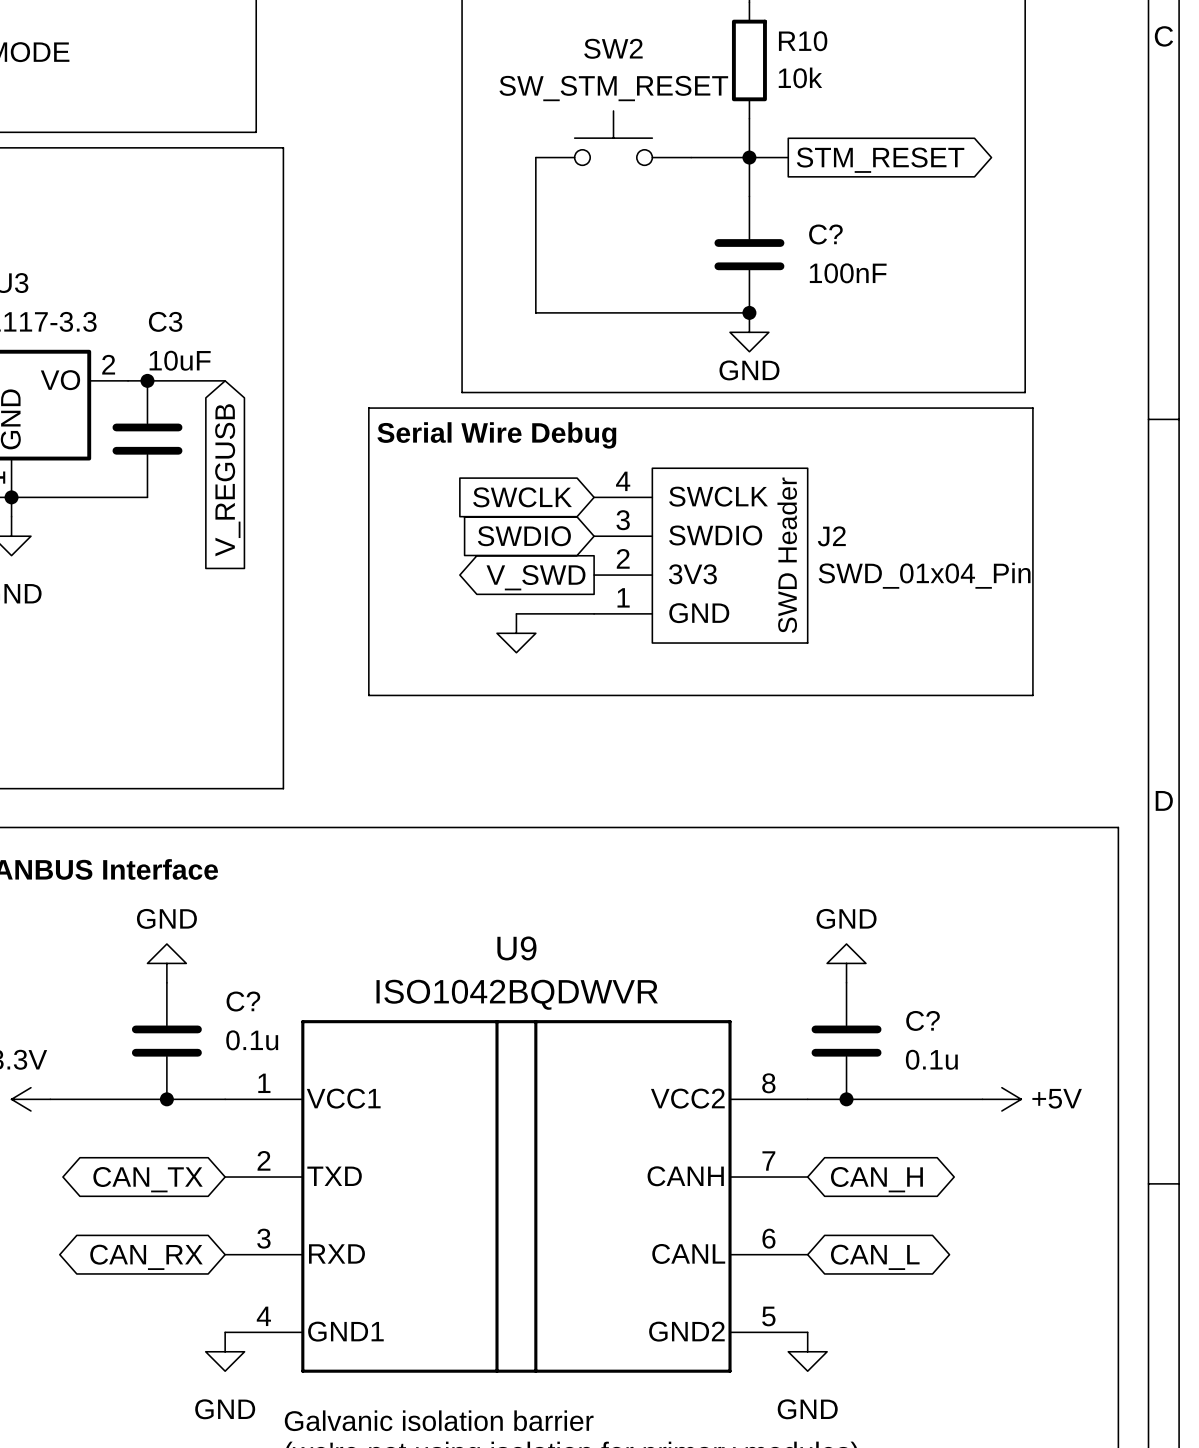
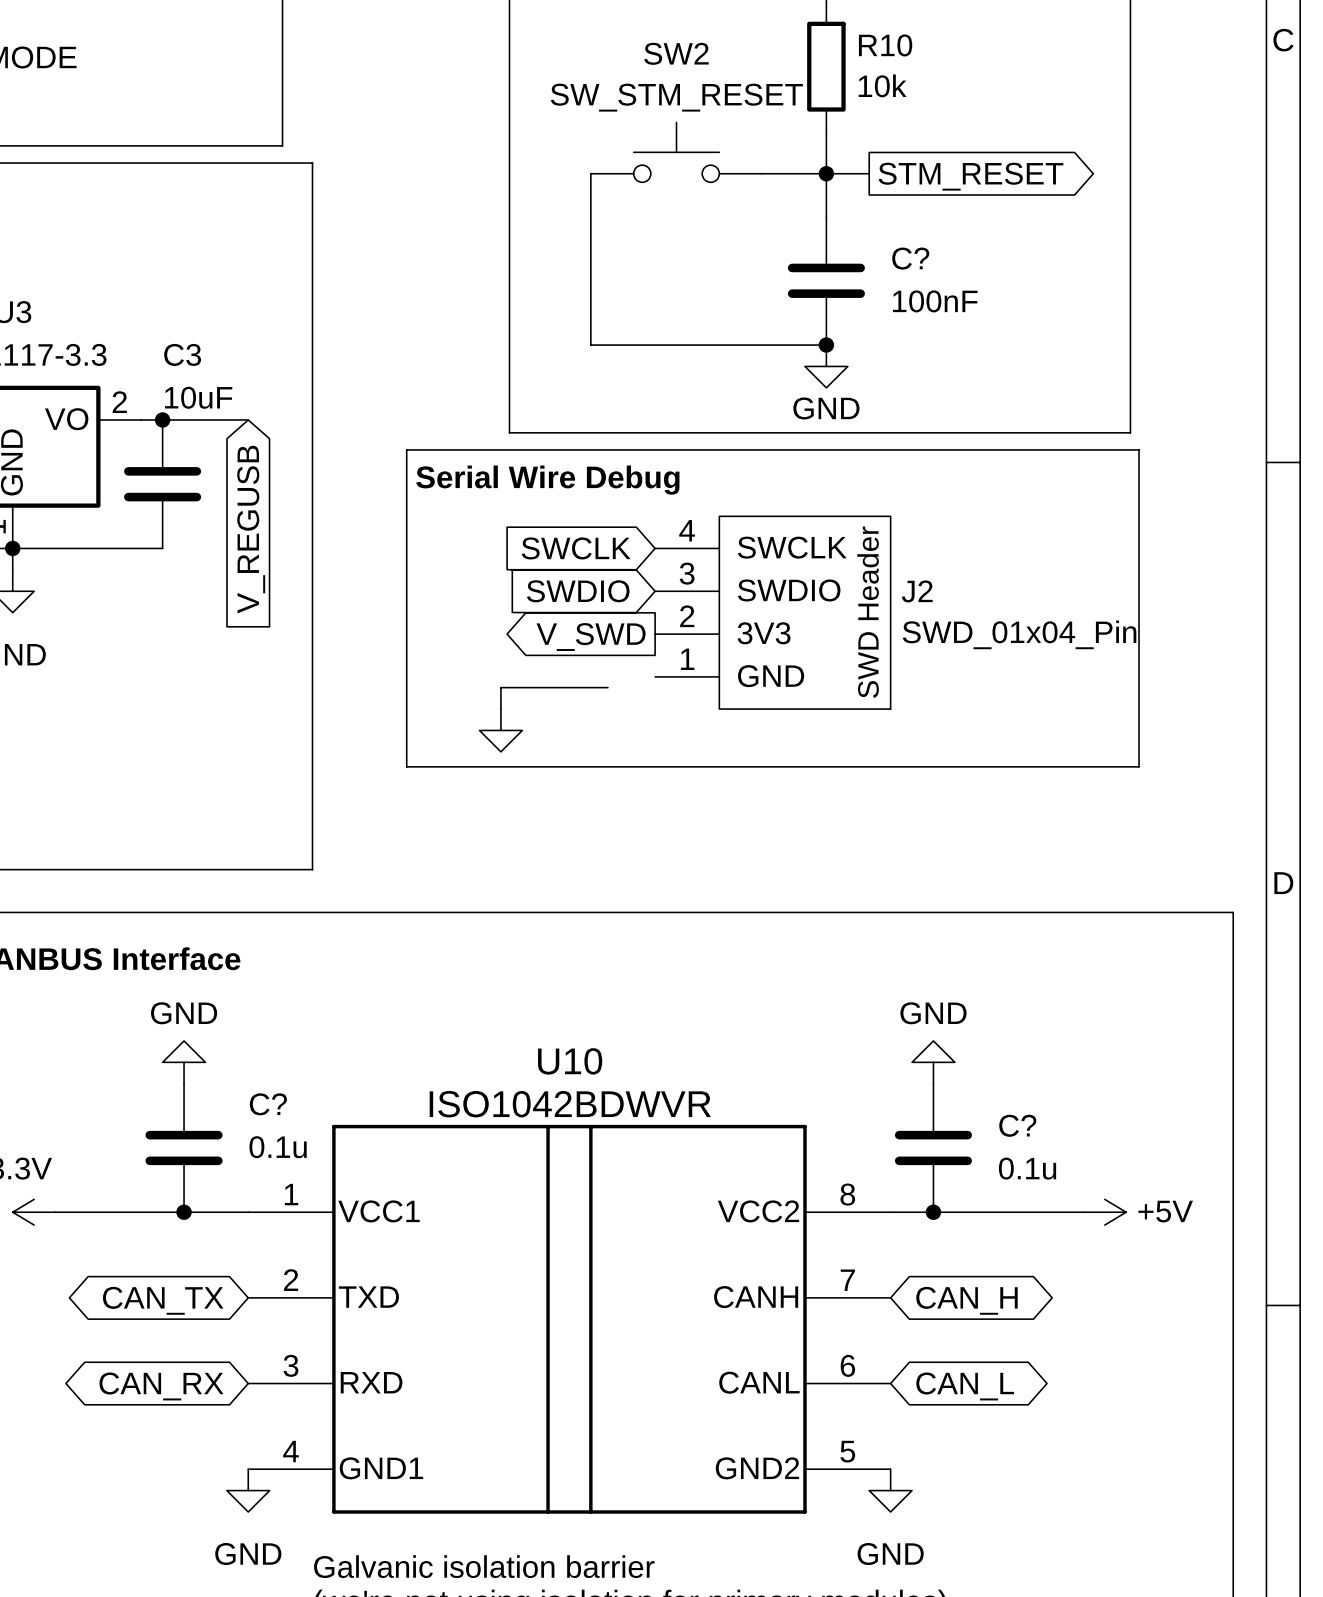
wire: (516, 613) (594, 613) -> none
wire: none -> (607, 687) (500, 687) (500, 709)
power symbol position: (516, 633) -> (500, 730)
U9 name: U9 (516, 948) -> U10 (570, 1061)
U9 value: ISO1042BQDWVR (517, 994) -> ISO1042BDWVR (570, 1104)

